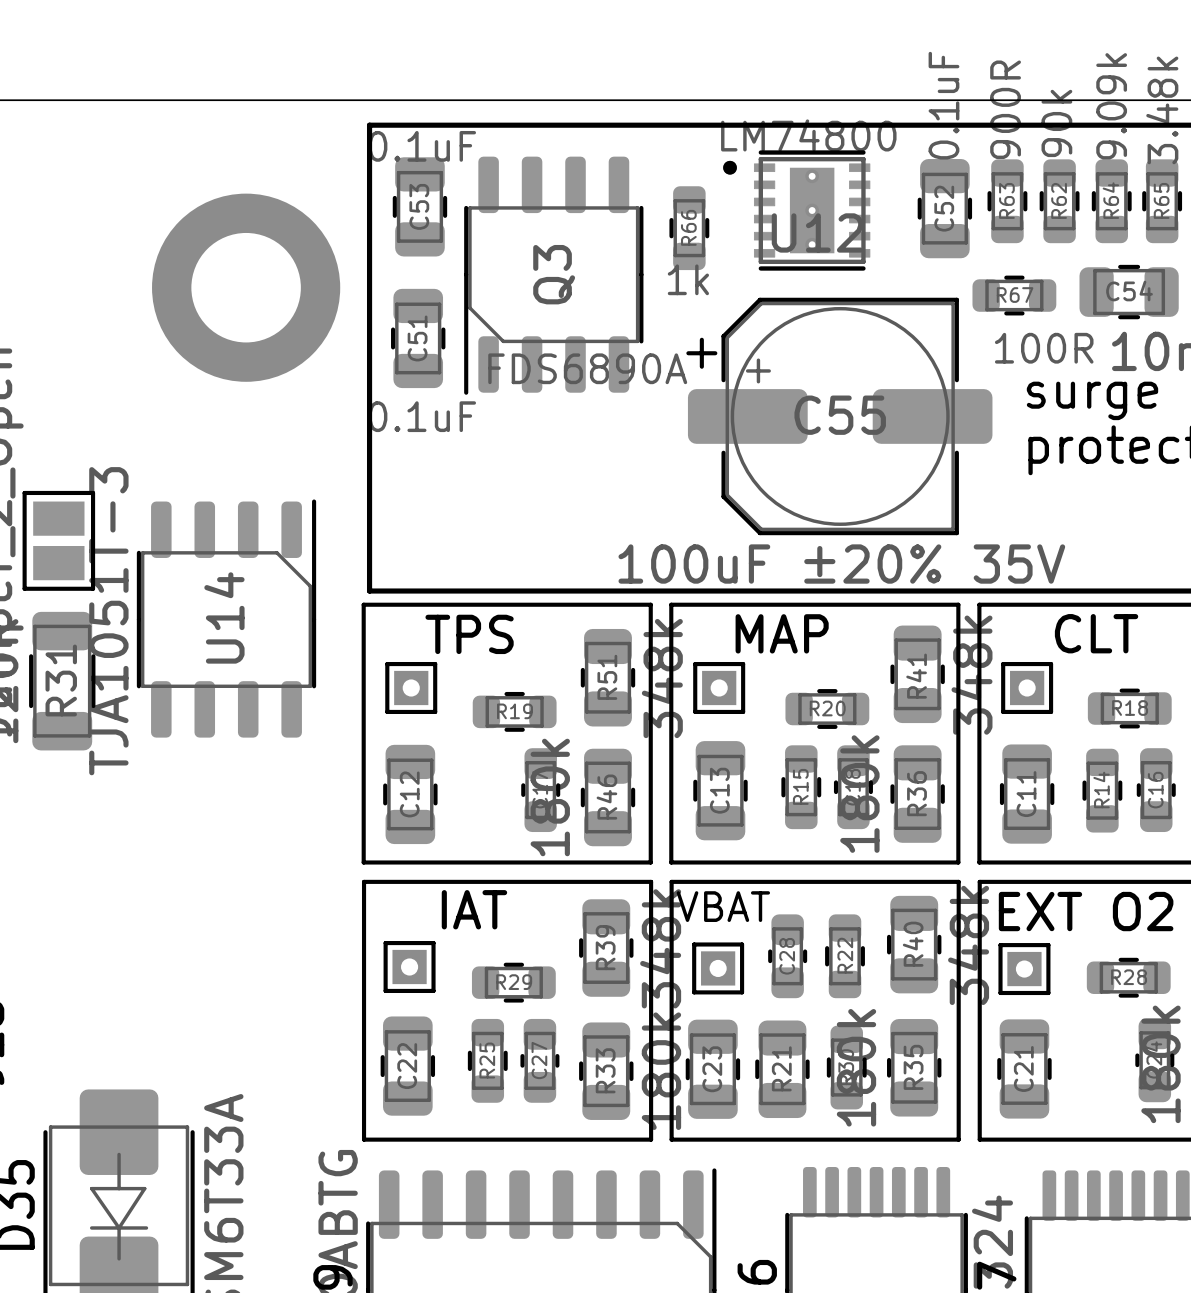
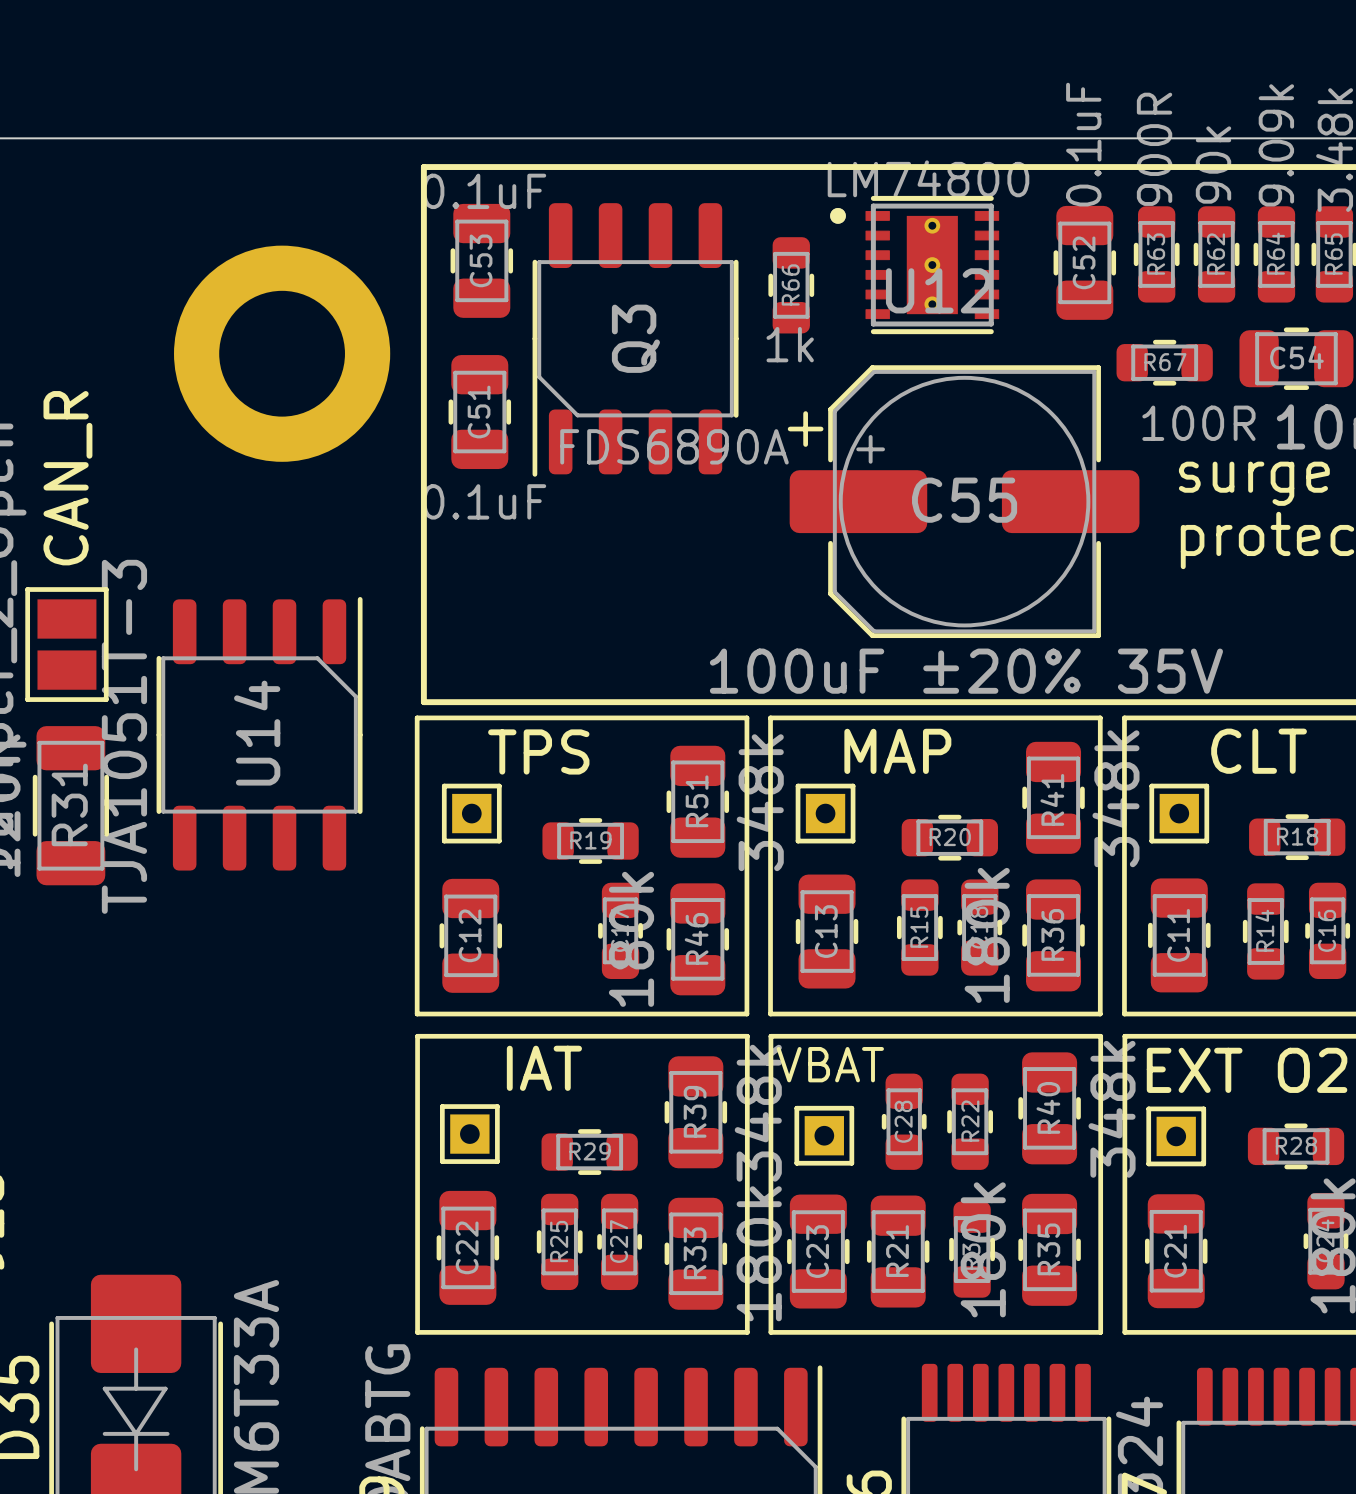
text: none -> CAN_R (67, 478)

